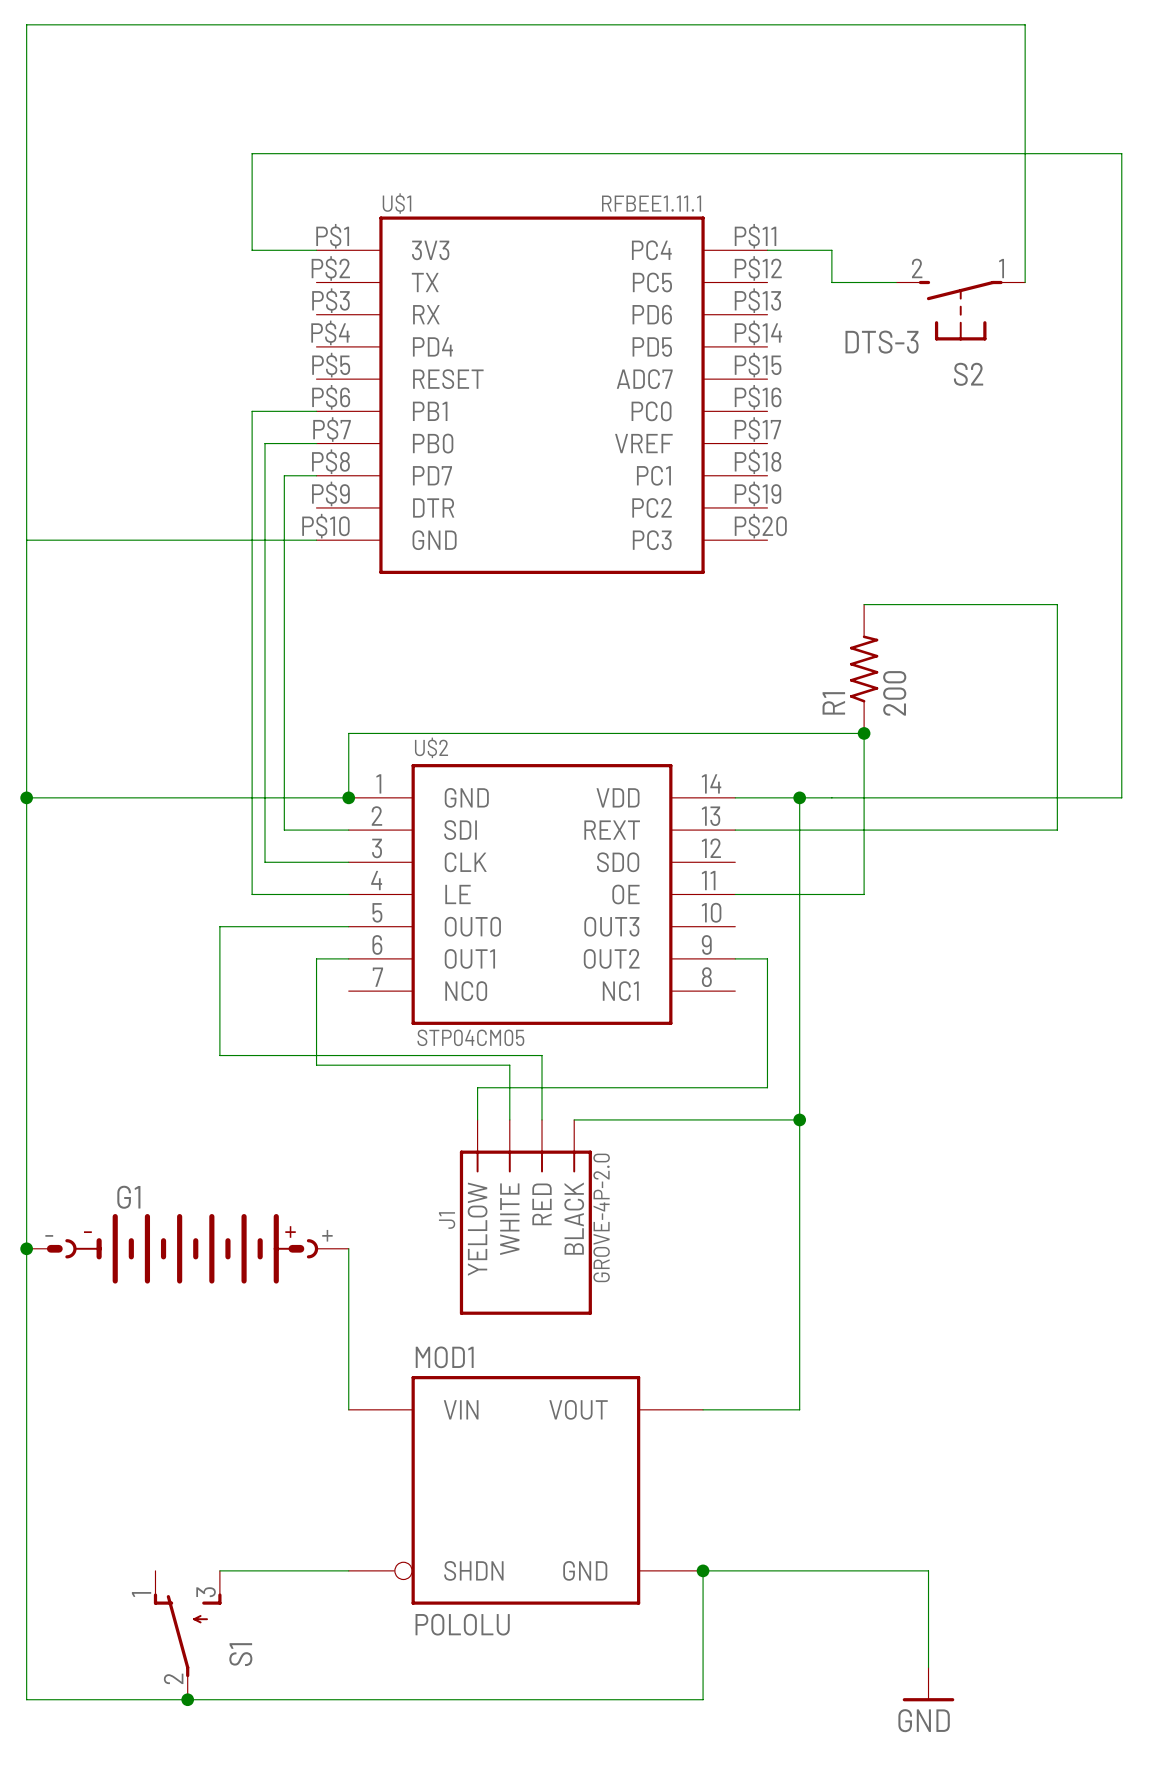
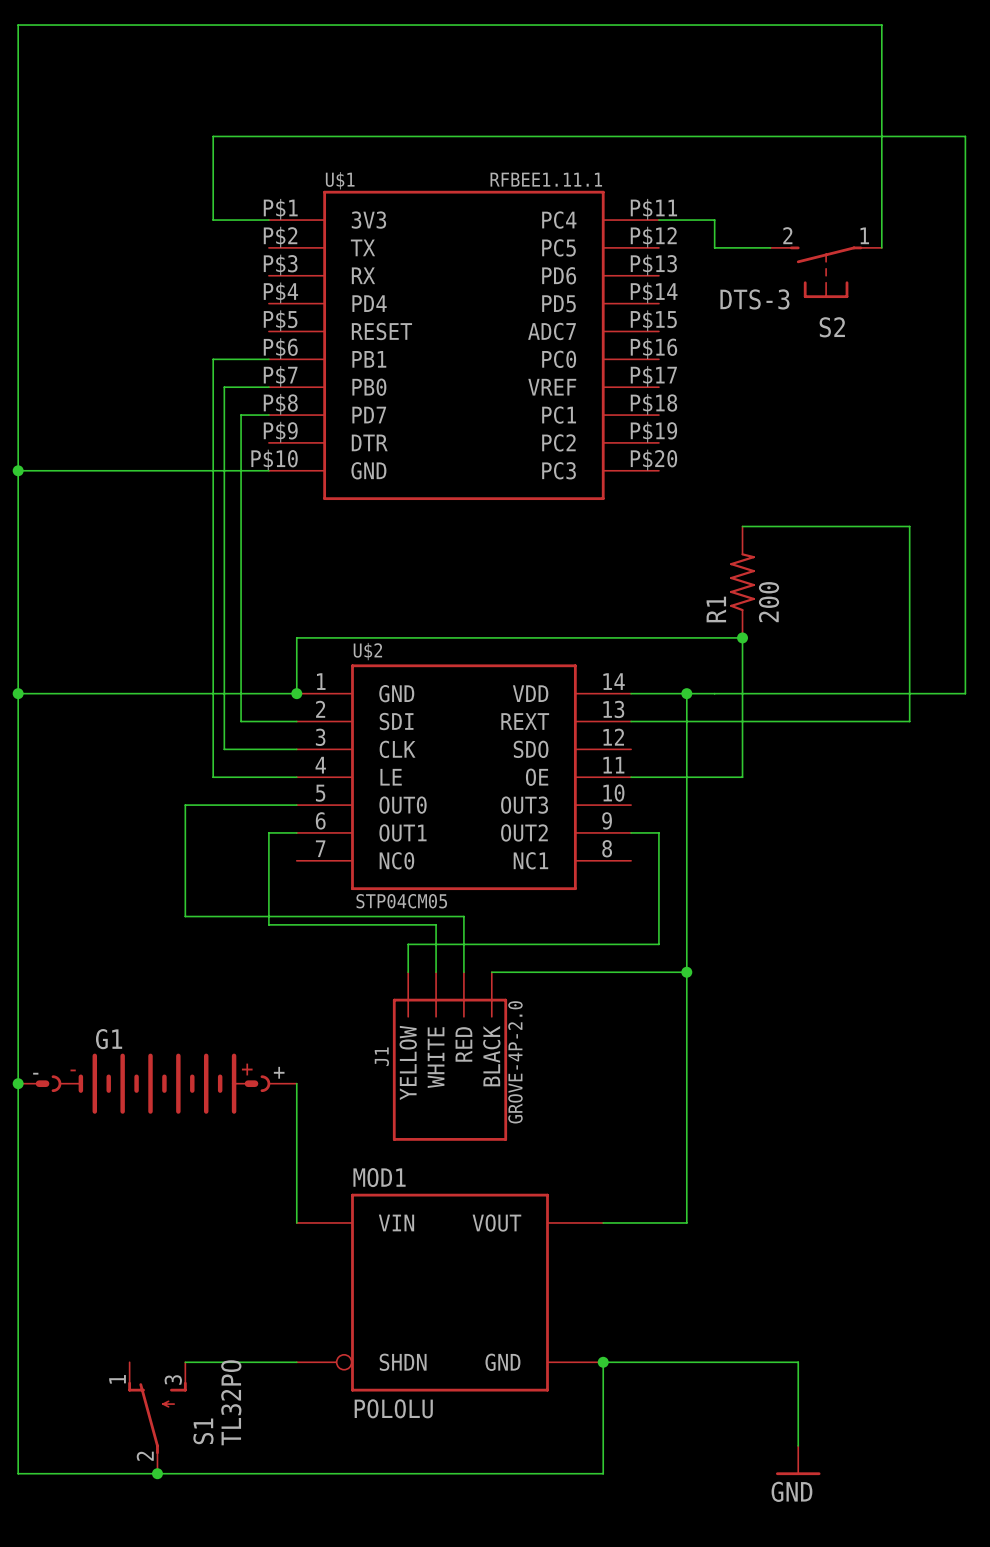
junction: none -> (18, 470)
S1 value: none -> TL32PO (231, 1402)

